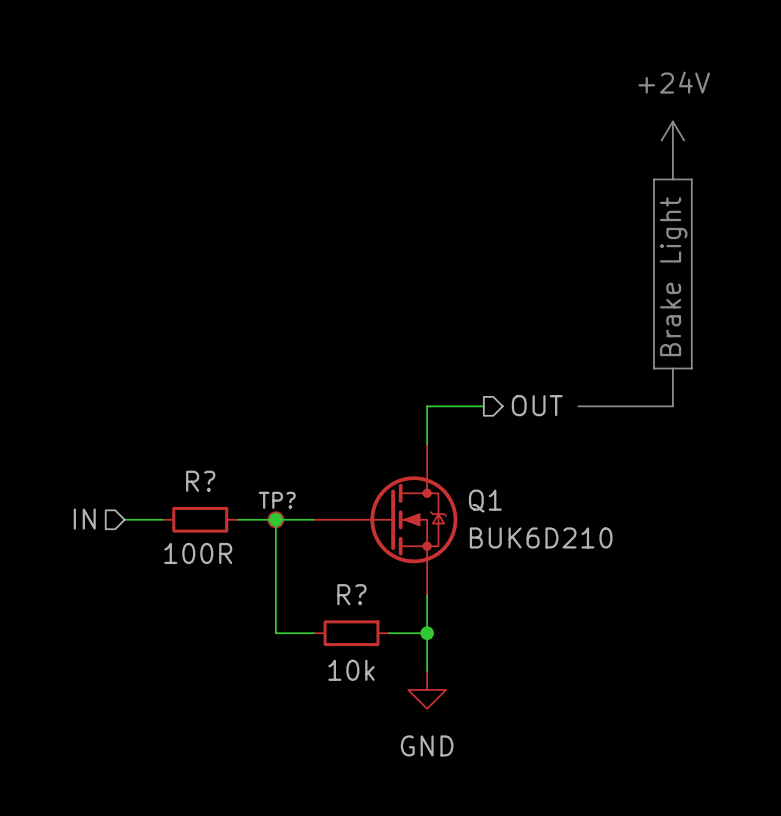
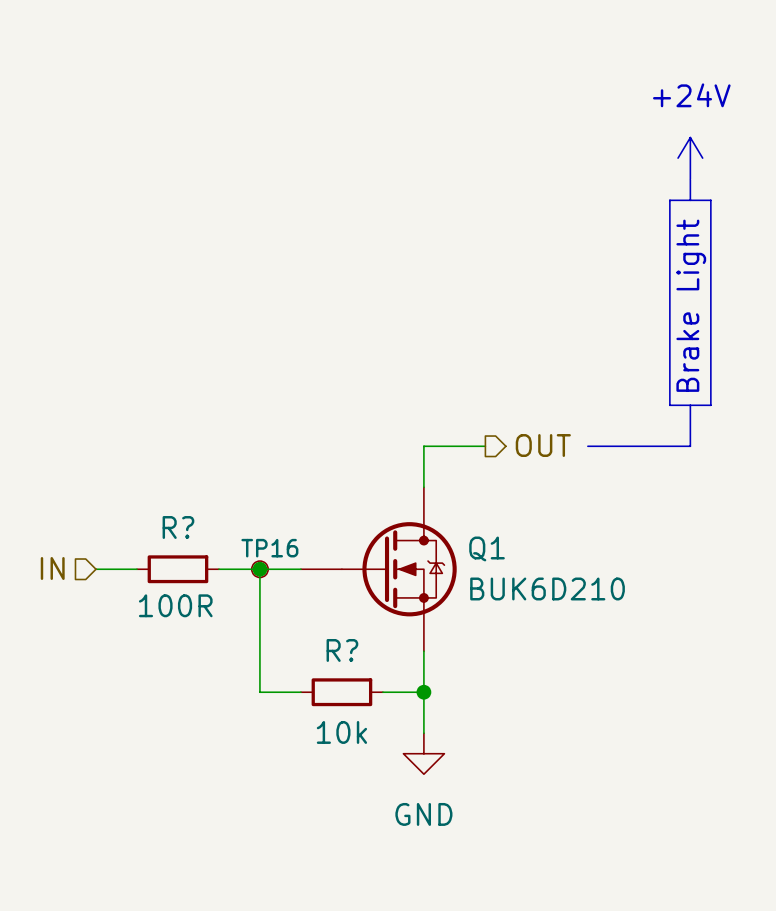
TP? name: TP? (277, 500) -> TP16 (269, 548)

